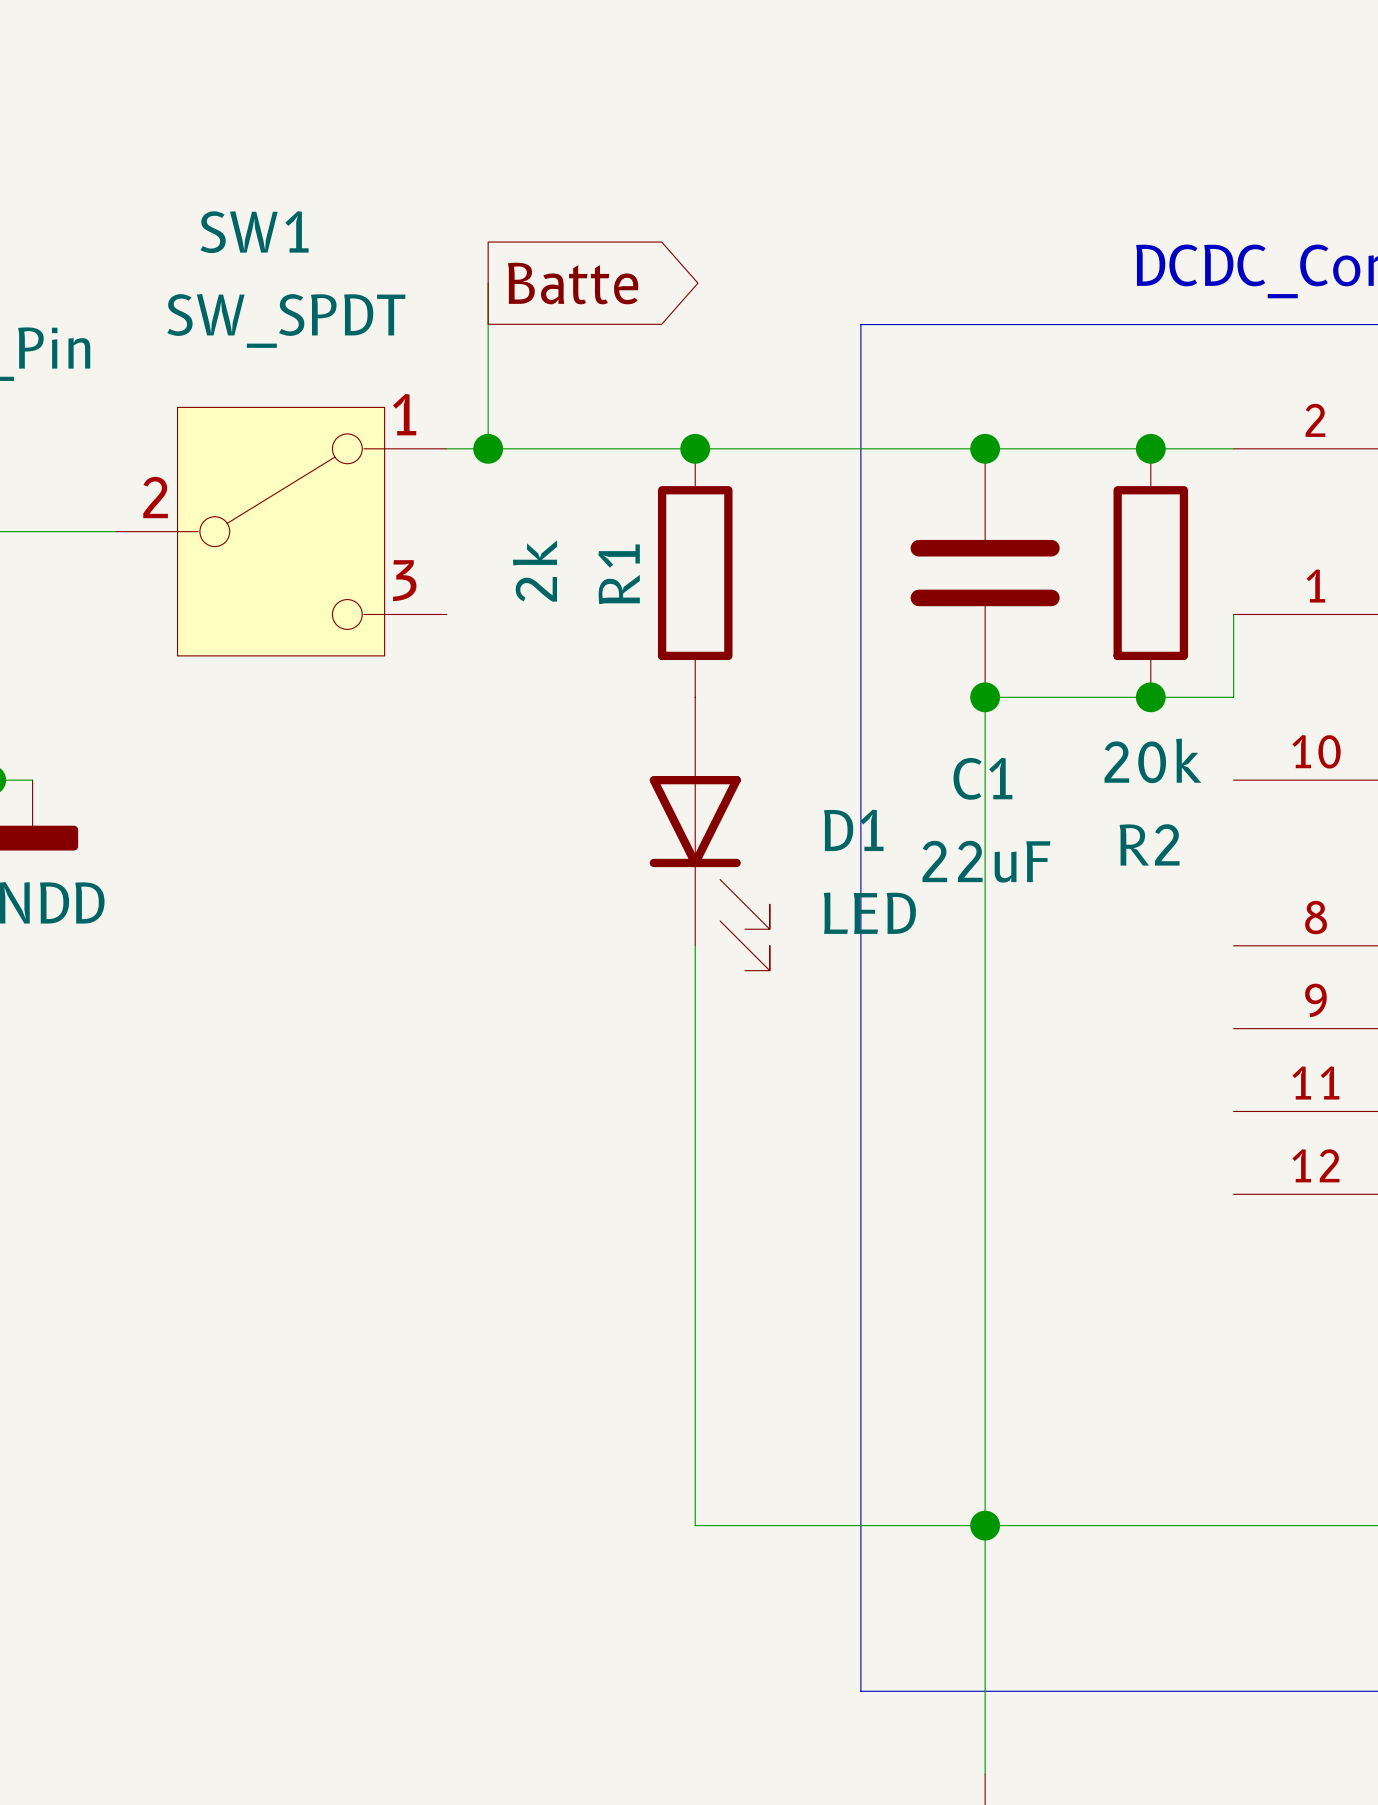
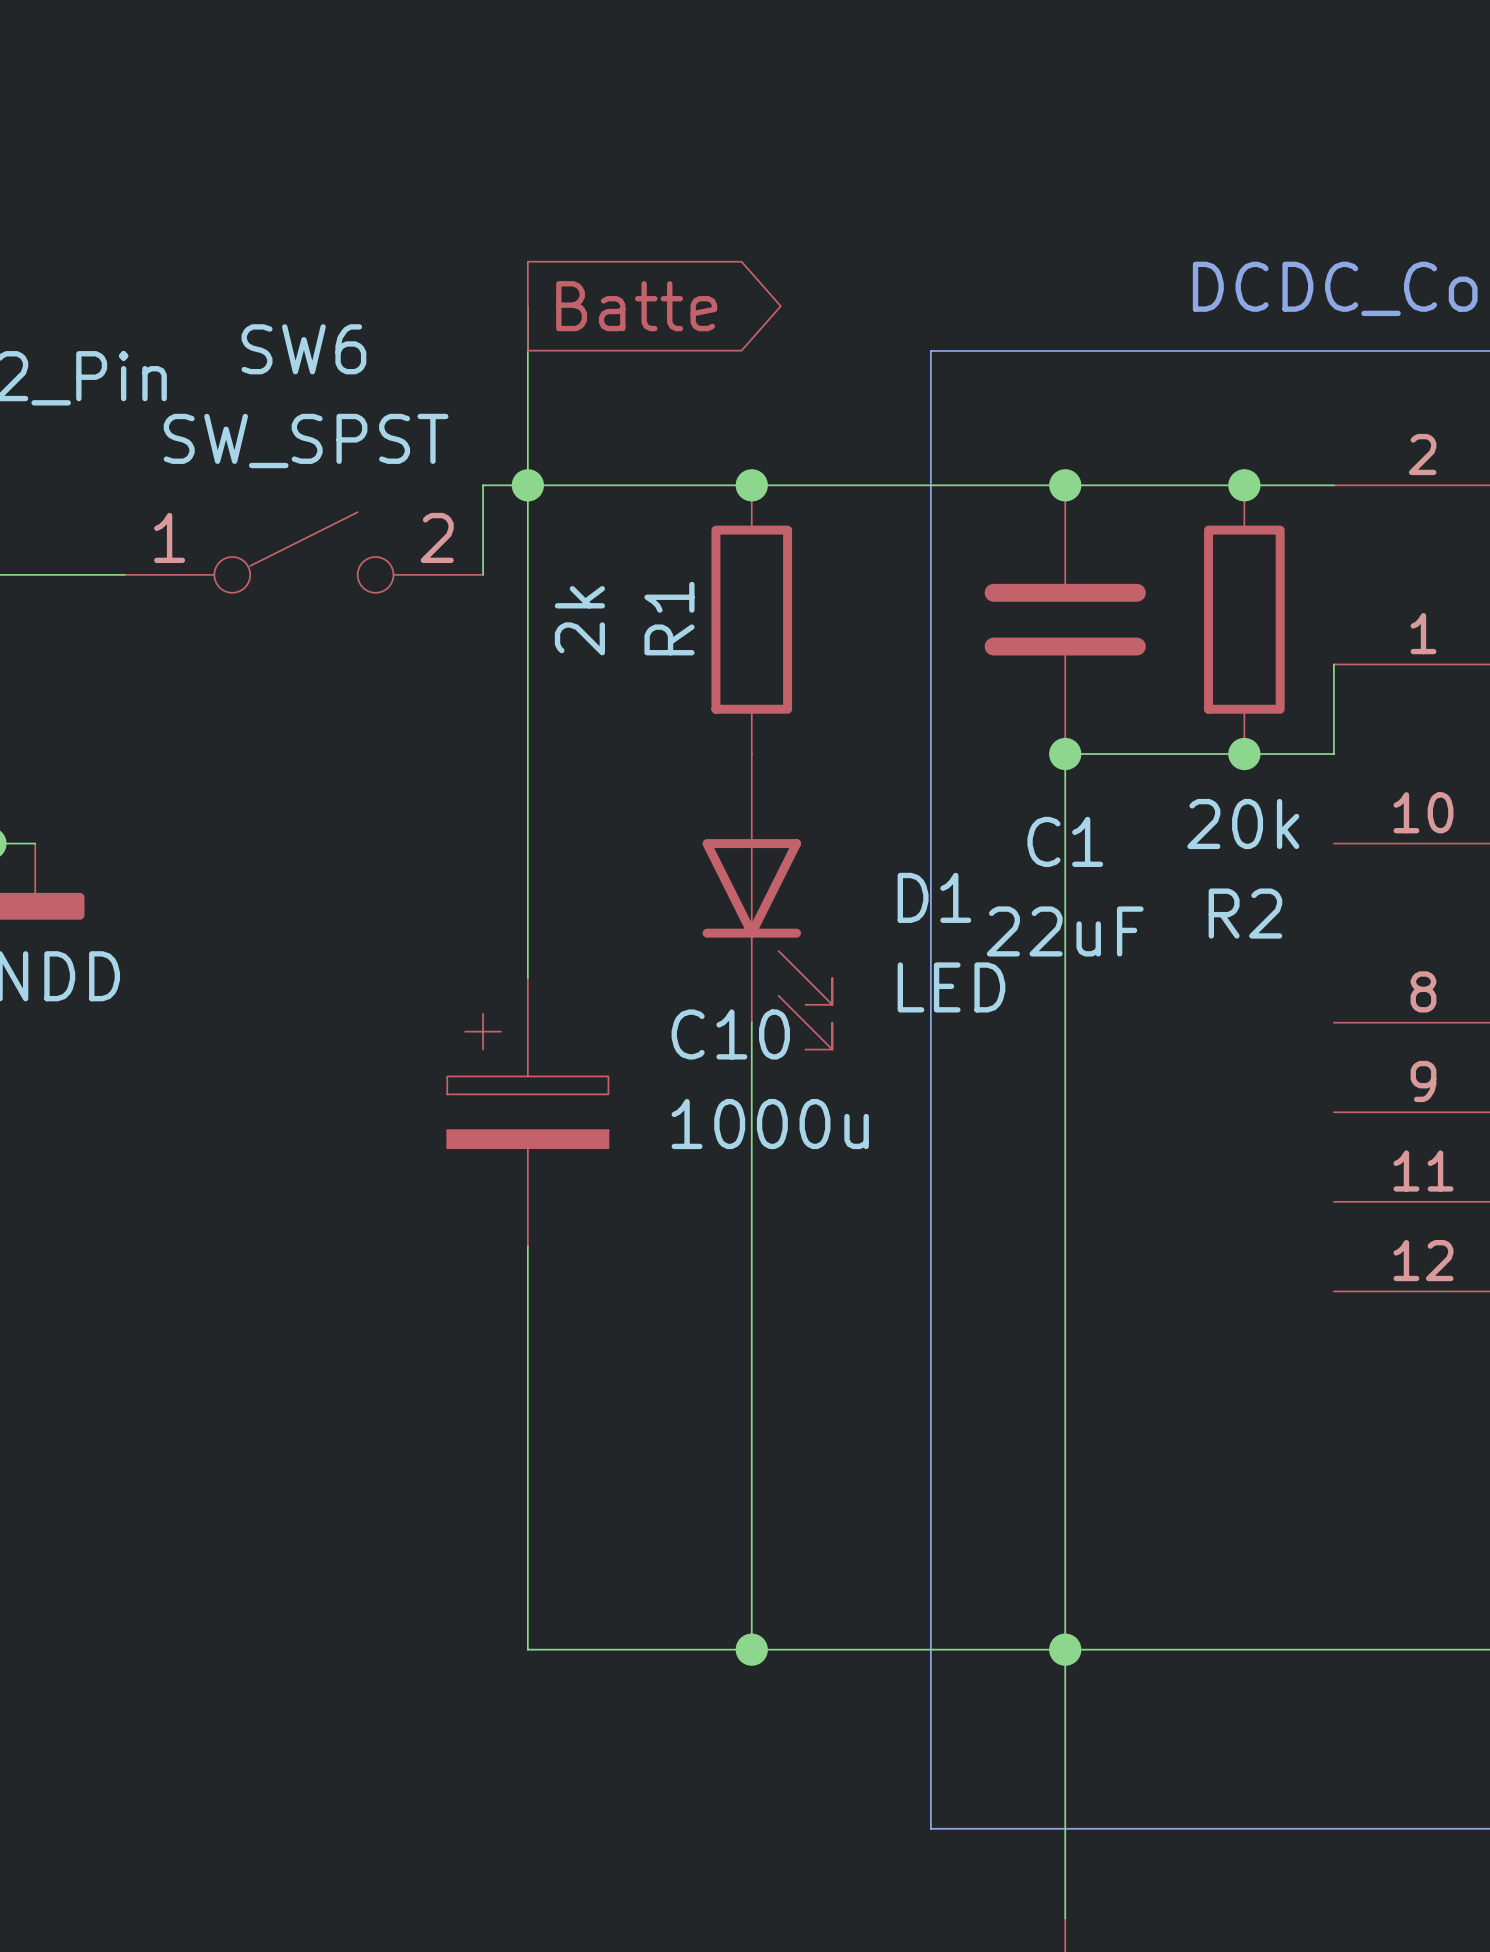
wire: none -> (483, 485) (483, 574)
wire: none -> (527, 485) (527, 977)
SW6: none -> SW_SPST (303, 552)
SW1: SW_SPDT (281, 531) -> none
C10: none -> 1000u (527, 1112)
wire: none -> (527, 1246) (527, 1649) (751, 1649)
junction: none -> (751, 1649)

